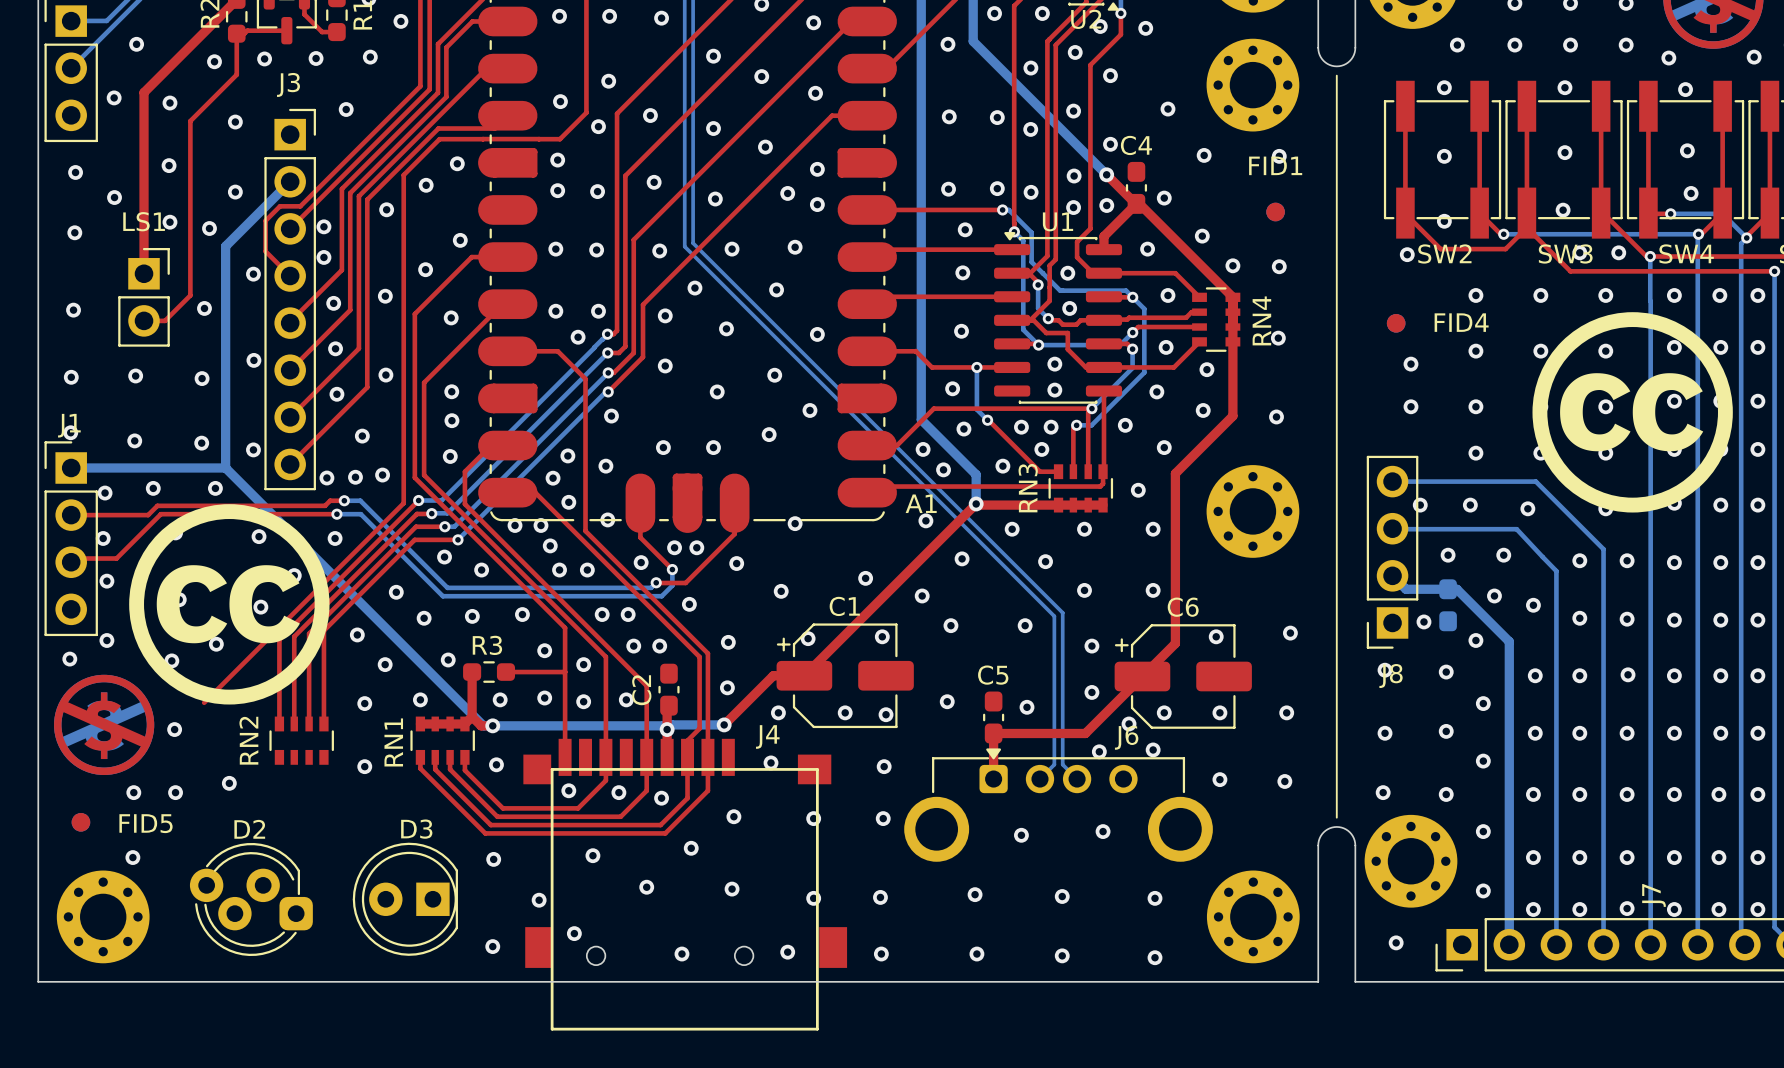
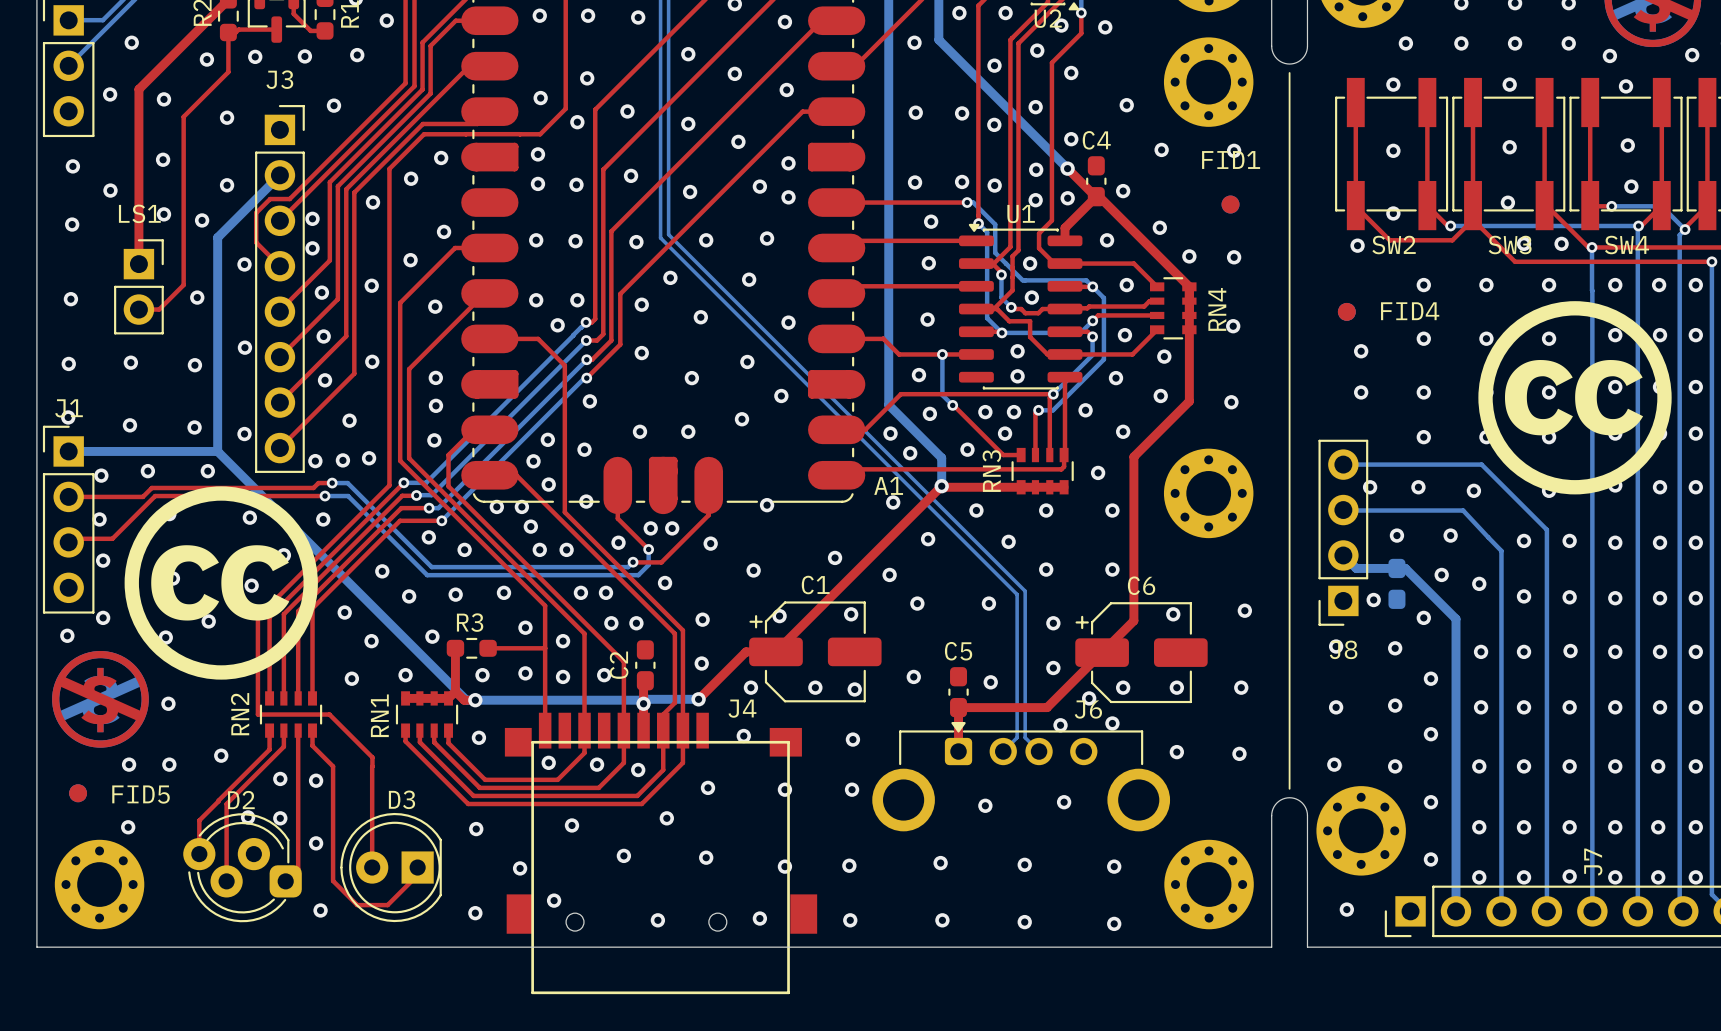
top track: (267, 639) (204, 702) -> (257, 616) (257, 714) (329, 714) (372, 757) (372, 867)
top track: none -> (269, 730) (269, 749) (199, 820) (199, 854)
top track: none -> (283, 730) (283, 746) (226, 804) (226, 881)
top track: none -> (298, 730) (298, 868) (285, 881)
top track: none -> (312, 730) (312, 745) (333, 766) (333, 880) (357, 905) (387, 905) (417, 875) (417, 867)
via: (364, 766) -> none
via: none -> (280, 778)
via: none -> (316, 780)
via: none -> (248, 817)
via: none -> (280, 818)
via: none -> (316, 843)
via: none -> (320, 910)

